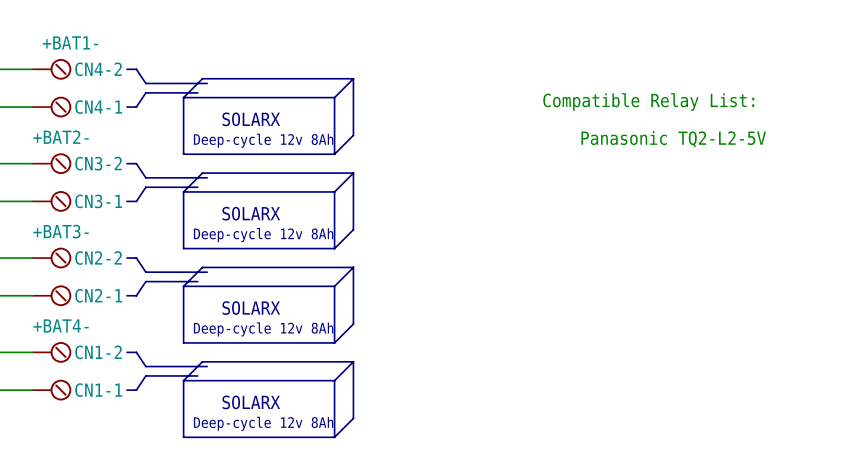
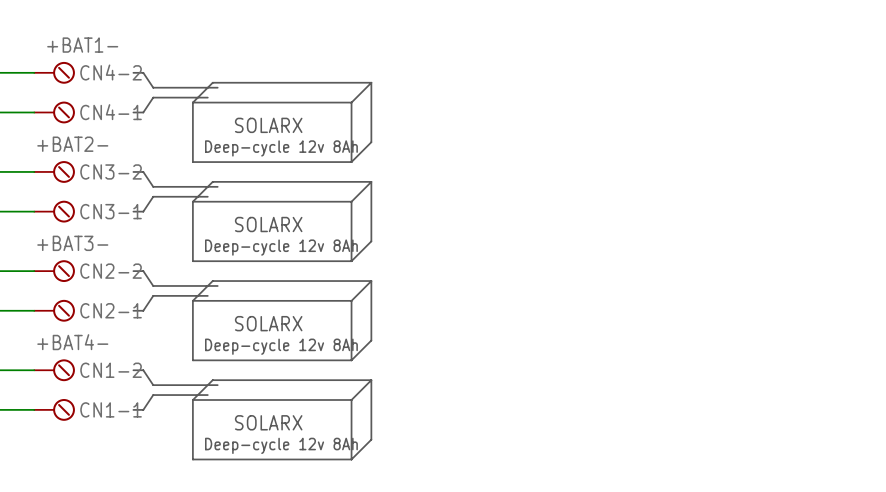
text: Compatible Relay List: (648, 102) -> none
text: Panasonic TQ2-L2-5V (673, 139) -> none

